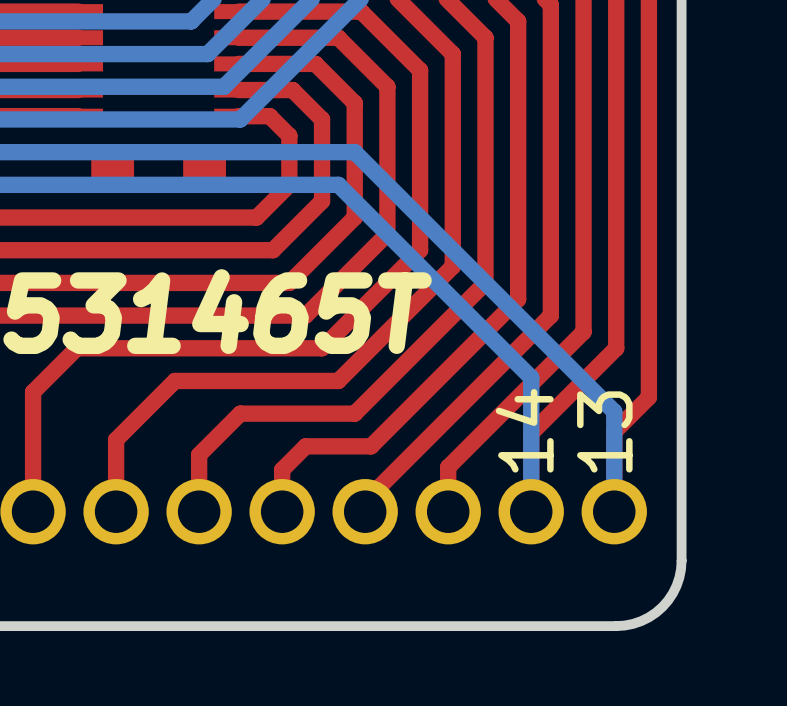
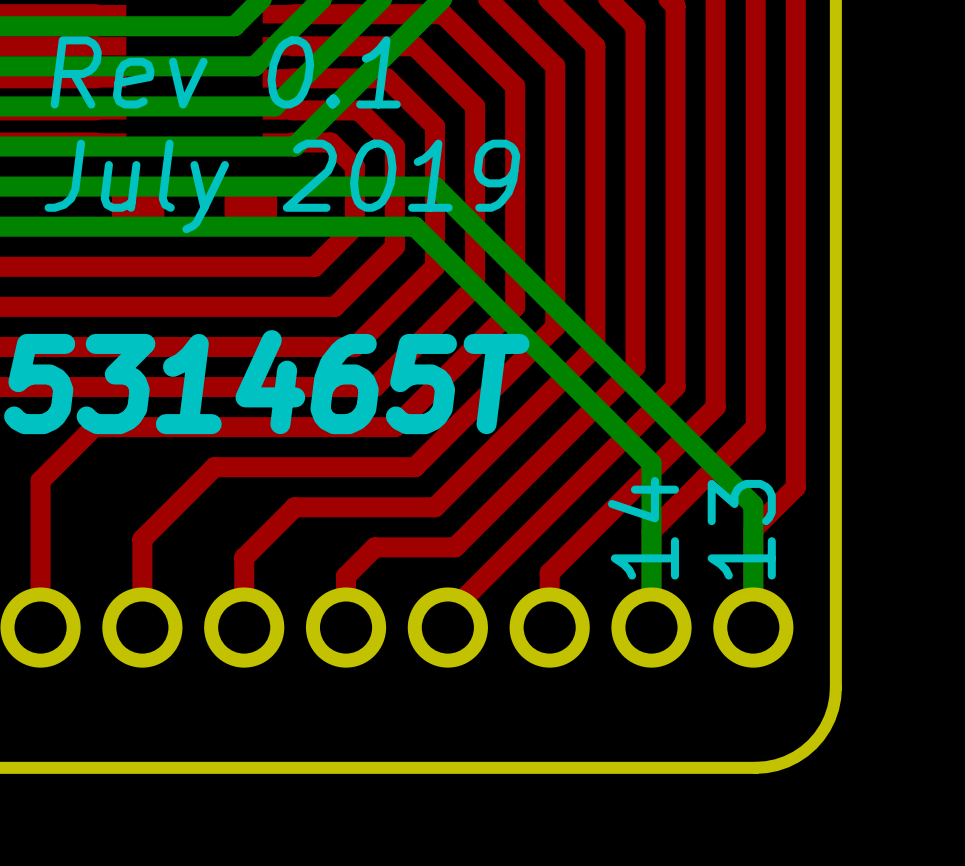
text: none -> Rev 0.1 (225, 72)
text: none -> July 2019 (282, 186)

